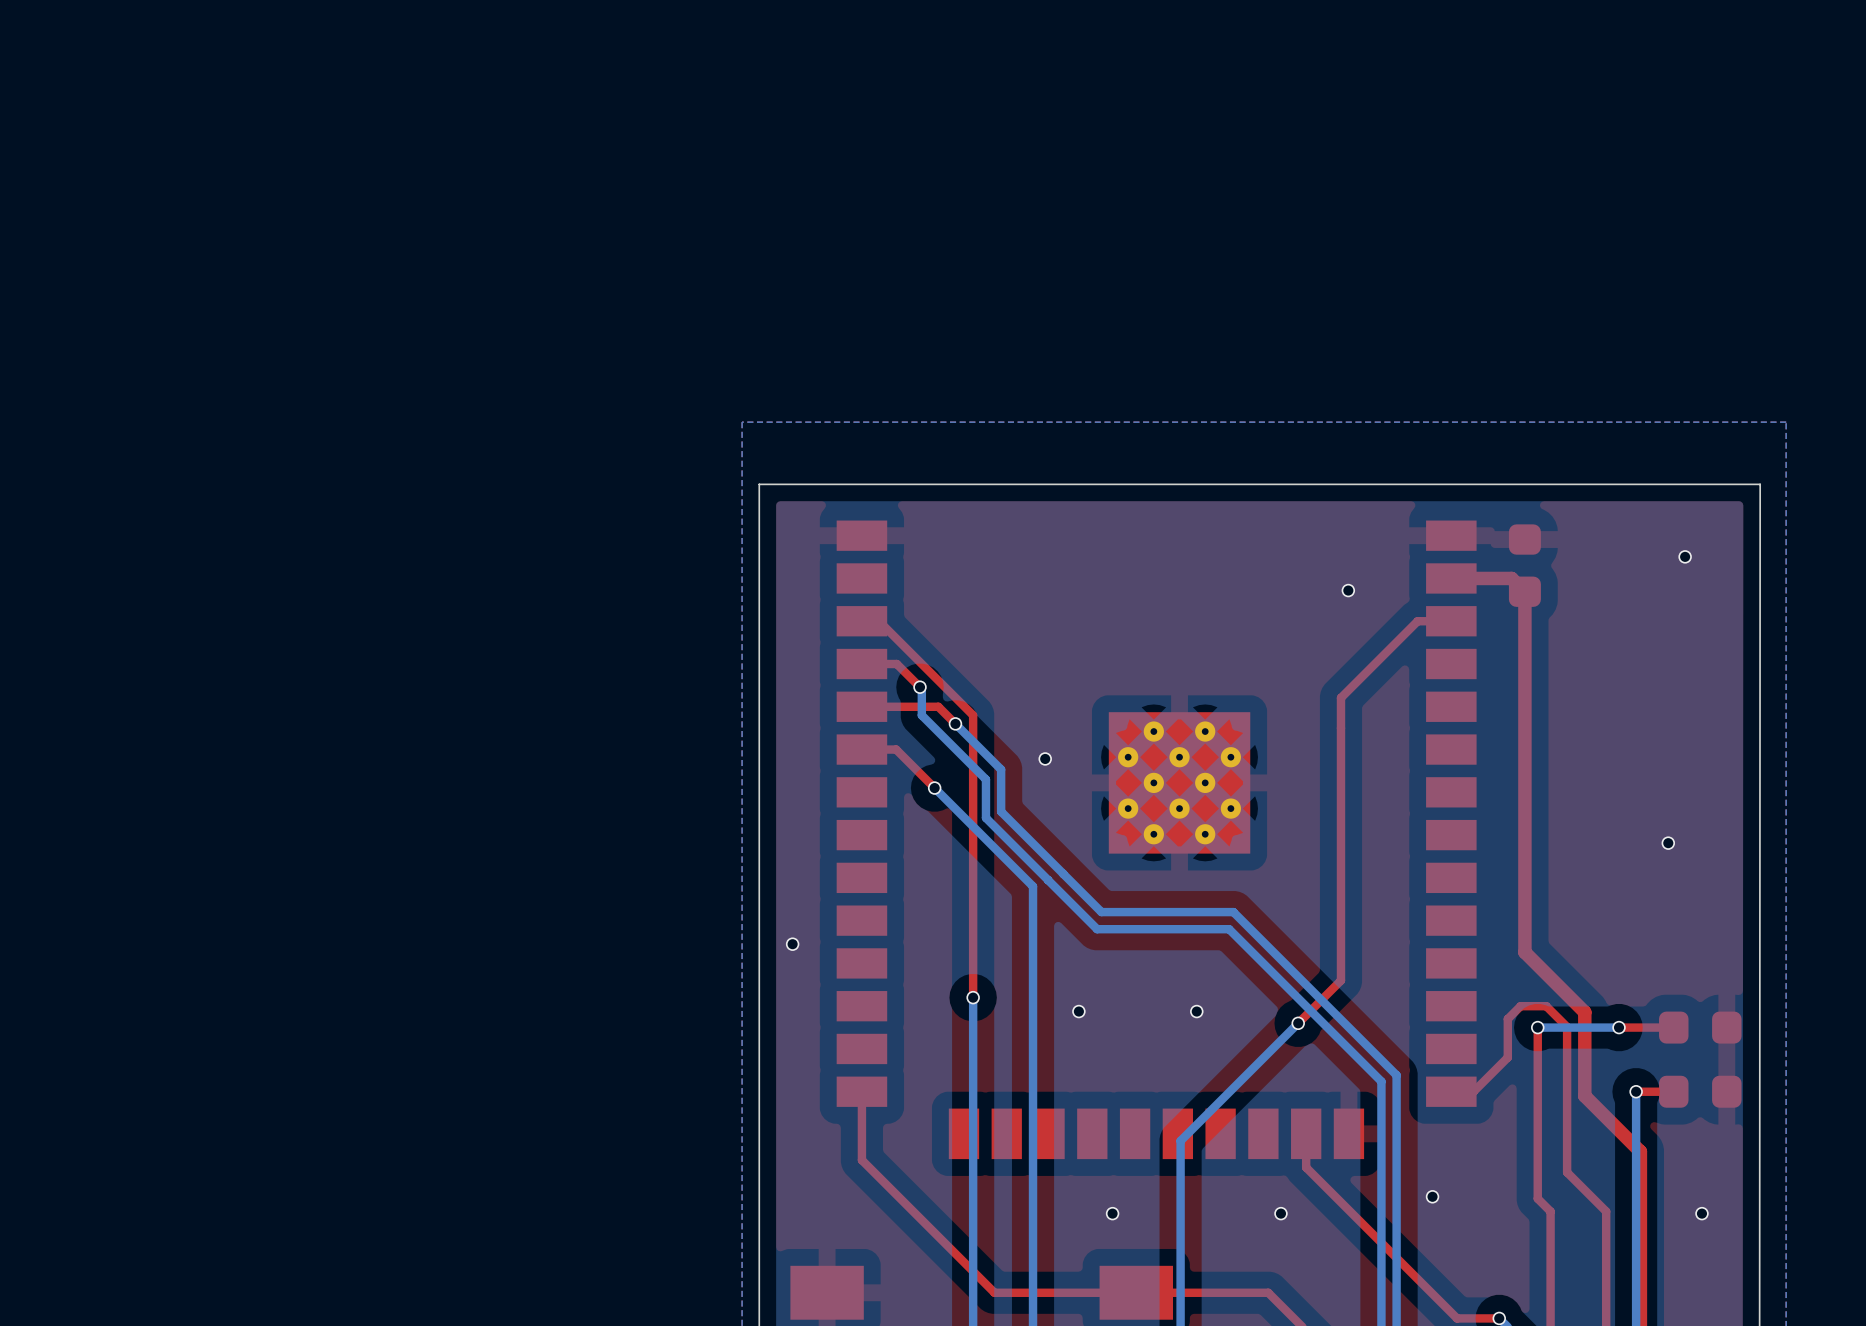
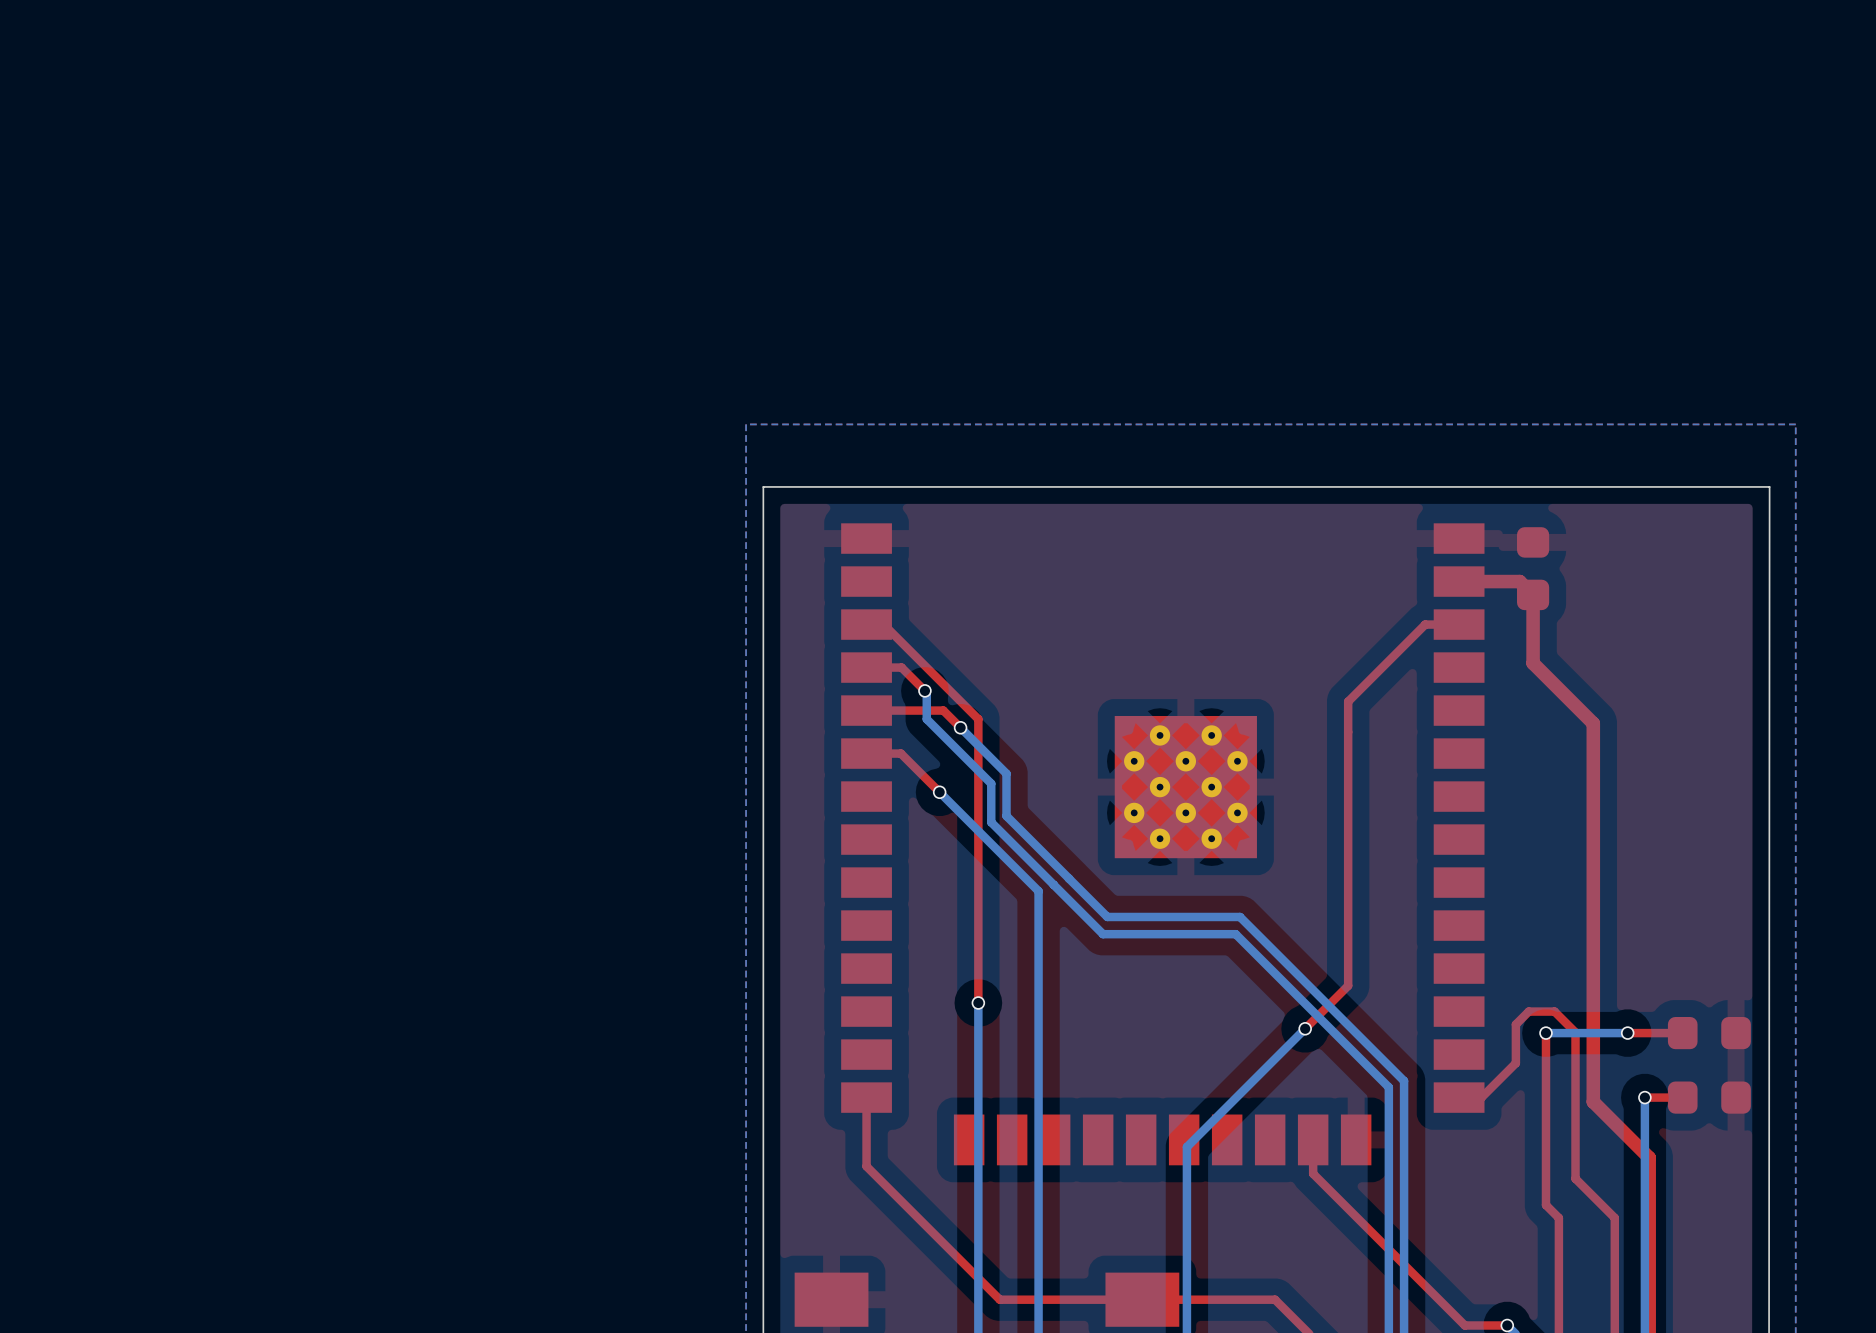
via: (1685, 556) -> none
via: (1348, 590) -> none
top track: (1524, 659) (1524, 952) (1584, 1012) -> (1533, 663) (1593, 723) (1593, 1017)
via: (1045, 758) -> none
via: (1668, 843) -> none
via: (792, 944) -> none
via: (1078, 1011) -> none
via: (1196, 1011) -> none
via: (1432, 1196) -> none
via: (1112, 1213) -> none
via: (1280, 1213) -> none
via: (1701, 1213) -> none

